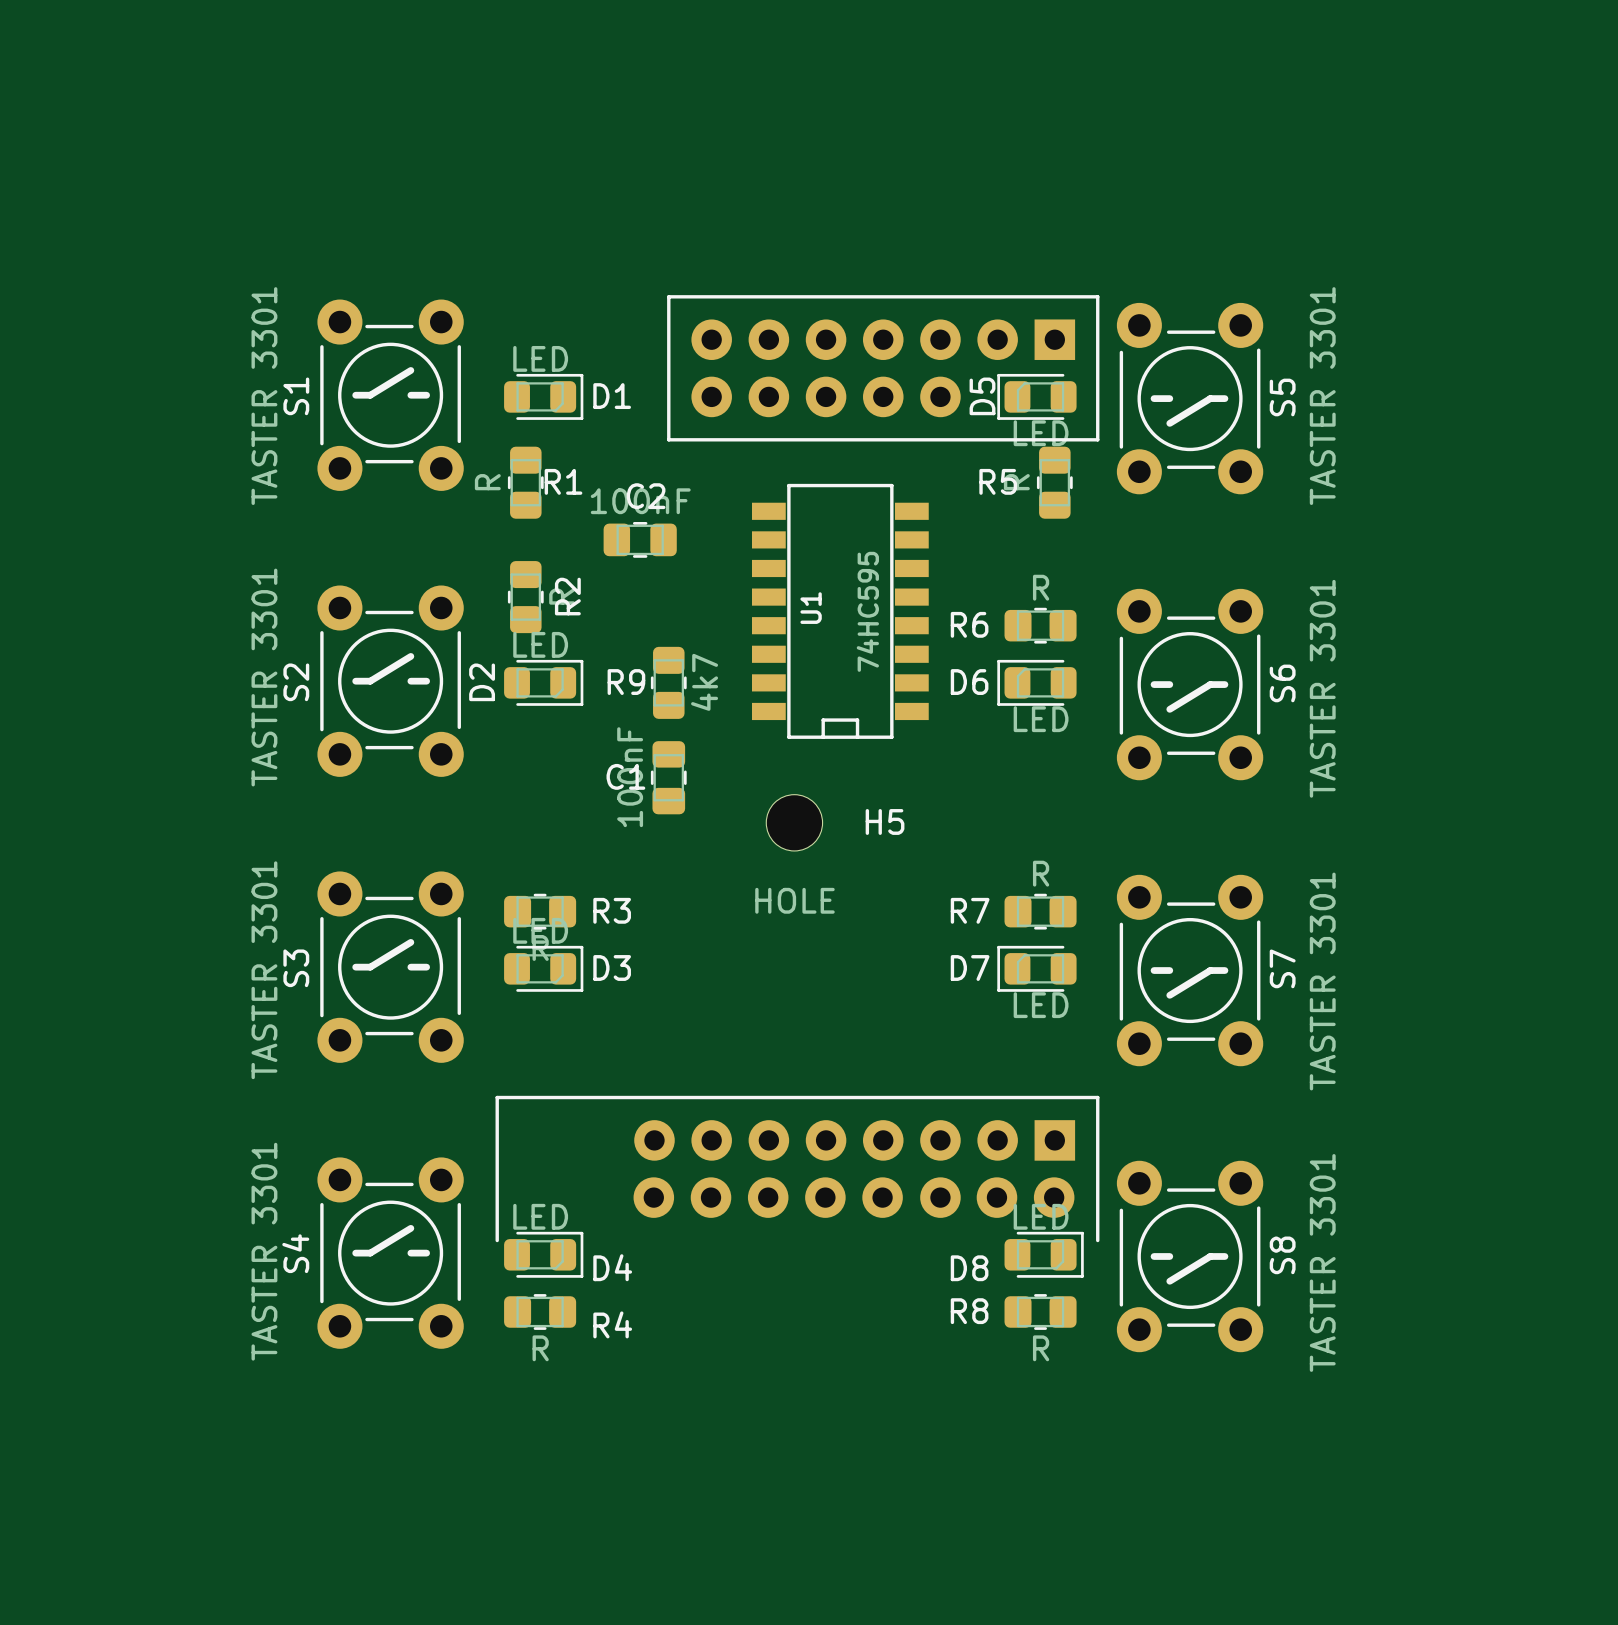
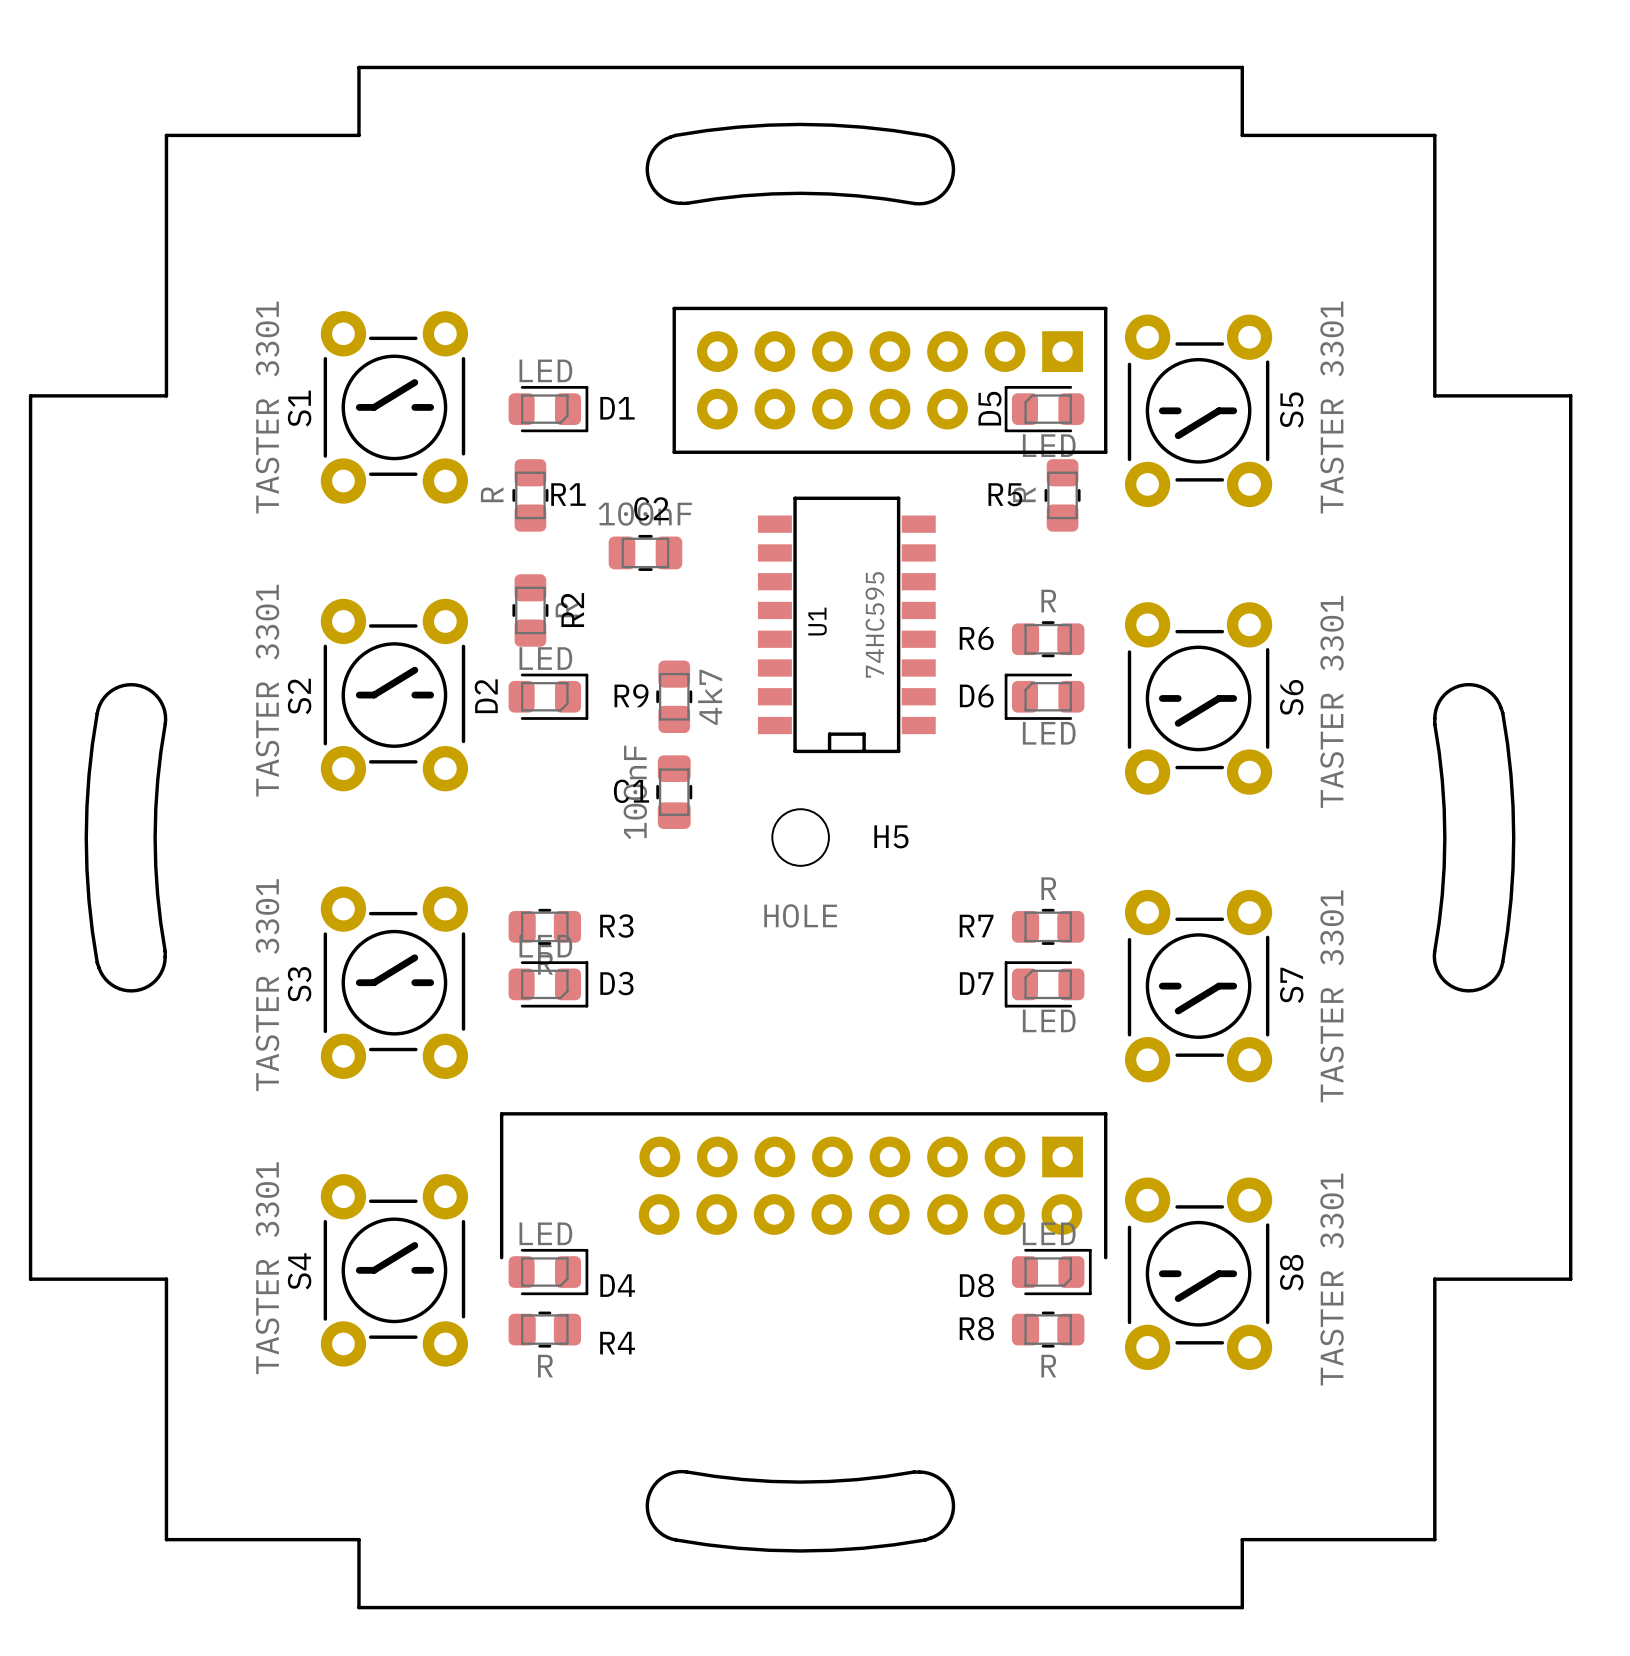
board edge: none -> (358, 67) (358, 135) (166, 135) (166, 395) (30, 395) (30, 1279) (166, 1279) (166, 1539) (358, 1539) (358, 1607) (1242, 1607) (1242, 1539) (1434, 1539) (1434, 1279) (1570, 1279) (1570, 395) (1434, 395) (1434, 135) (1242, 135) (1242, 67) (358, 67)
board edge: none -> (675, 135) (662, 140) (656, 146) (649, 157) (647, 170) (650, 183) (657, 193) (668, 200) (676, 203) (743, 195) (800, 193) (857, 195) (923, 203) (931, 201) (943, 194) (950, 183) (953, 174) (951, 156) (940, 142) (929, 136) (893, 130) (800, 124) (737, 127) (675, 135)
board edge: none -> (1501, 707) (1507, 743) (1513, 806) (1513, 868) (1507, 931) (1501, 966) (1495, 978) (1481, 988) (1463, 990) (1455, 988) (1444, 980) (1438, 973) (1434, 960) (1442, 895) (1444, 838) (1442, 780) (1435, 714) (1439, 701) (1447, 692) (1459, 686) (1467, 684) (1480, 686) (1488, 690) (1497, 700) (1501, 707)
board edge: none -> (97, 713) (89, 775) (86, 838) (92, 931) (97, 962) (105, 978) (119, 988) (136, 990) (144, 987) (155, 980) (160, 973) (164, 961) (157, 894) (155, 837) (157, 780) (165, 714) (163, 706) (155, 695) (144, 687) (131, 684) (118, 686) (107, 694) (99, 704) (97, 713)
board edge: none -> (686, 1471) (673, 1472) (657, 1481) (648, 1496) (648, 1514) (656, 1529) (667, 1537) (706, 1544) (800, 1550) (894, 1544) (925, 1540) (938, 1534) (947, 1525) (953, 1509) (952, 1496) (946, 1484) (936, 1476) (923, 1472) (857, 1479) (800, 1482) (743, 1479) (686, 1471)

